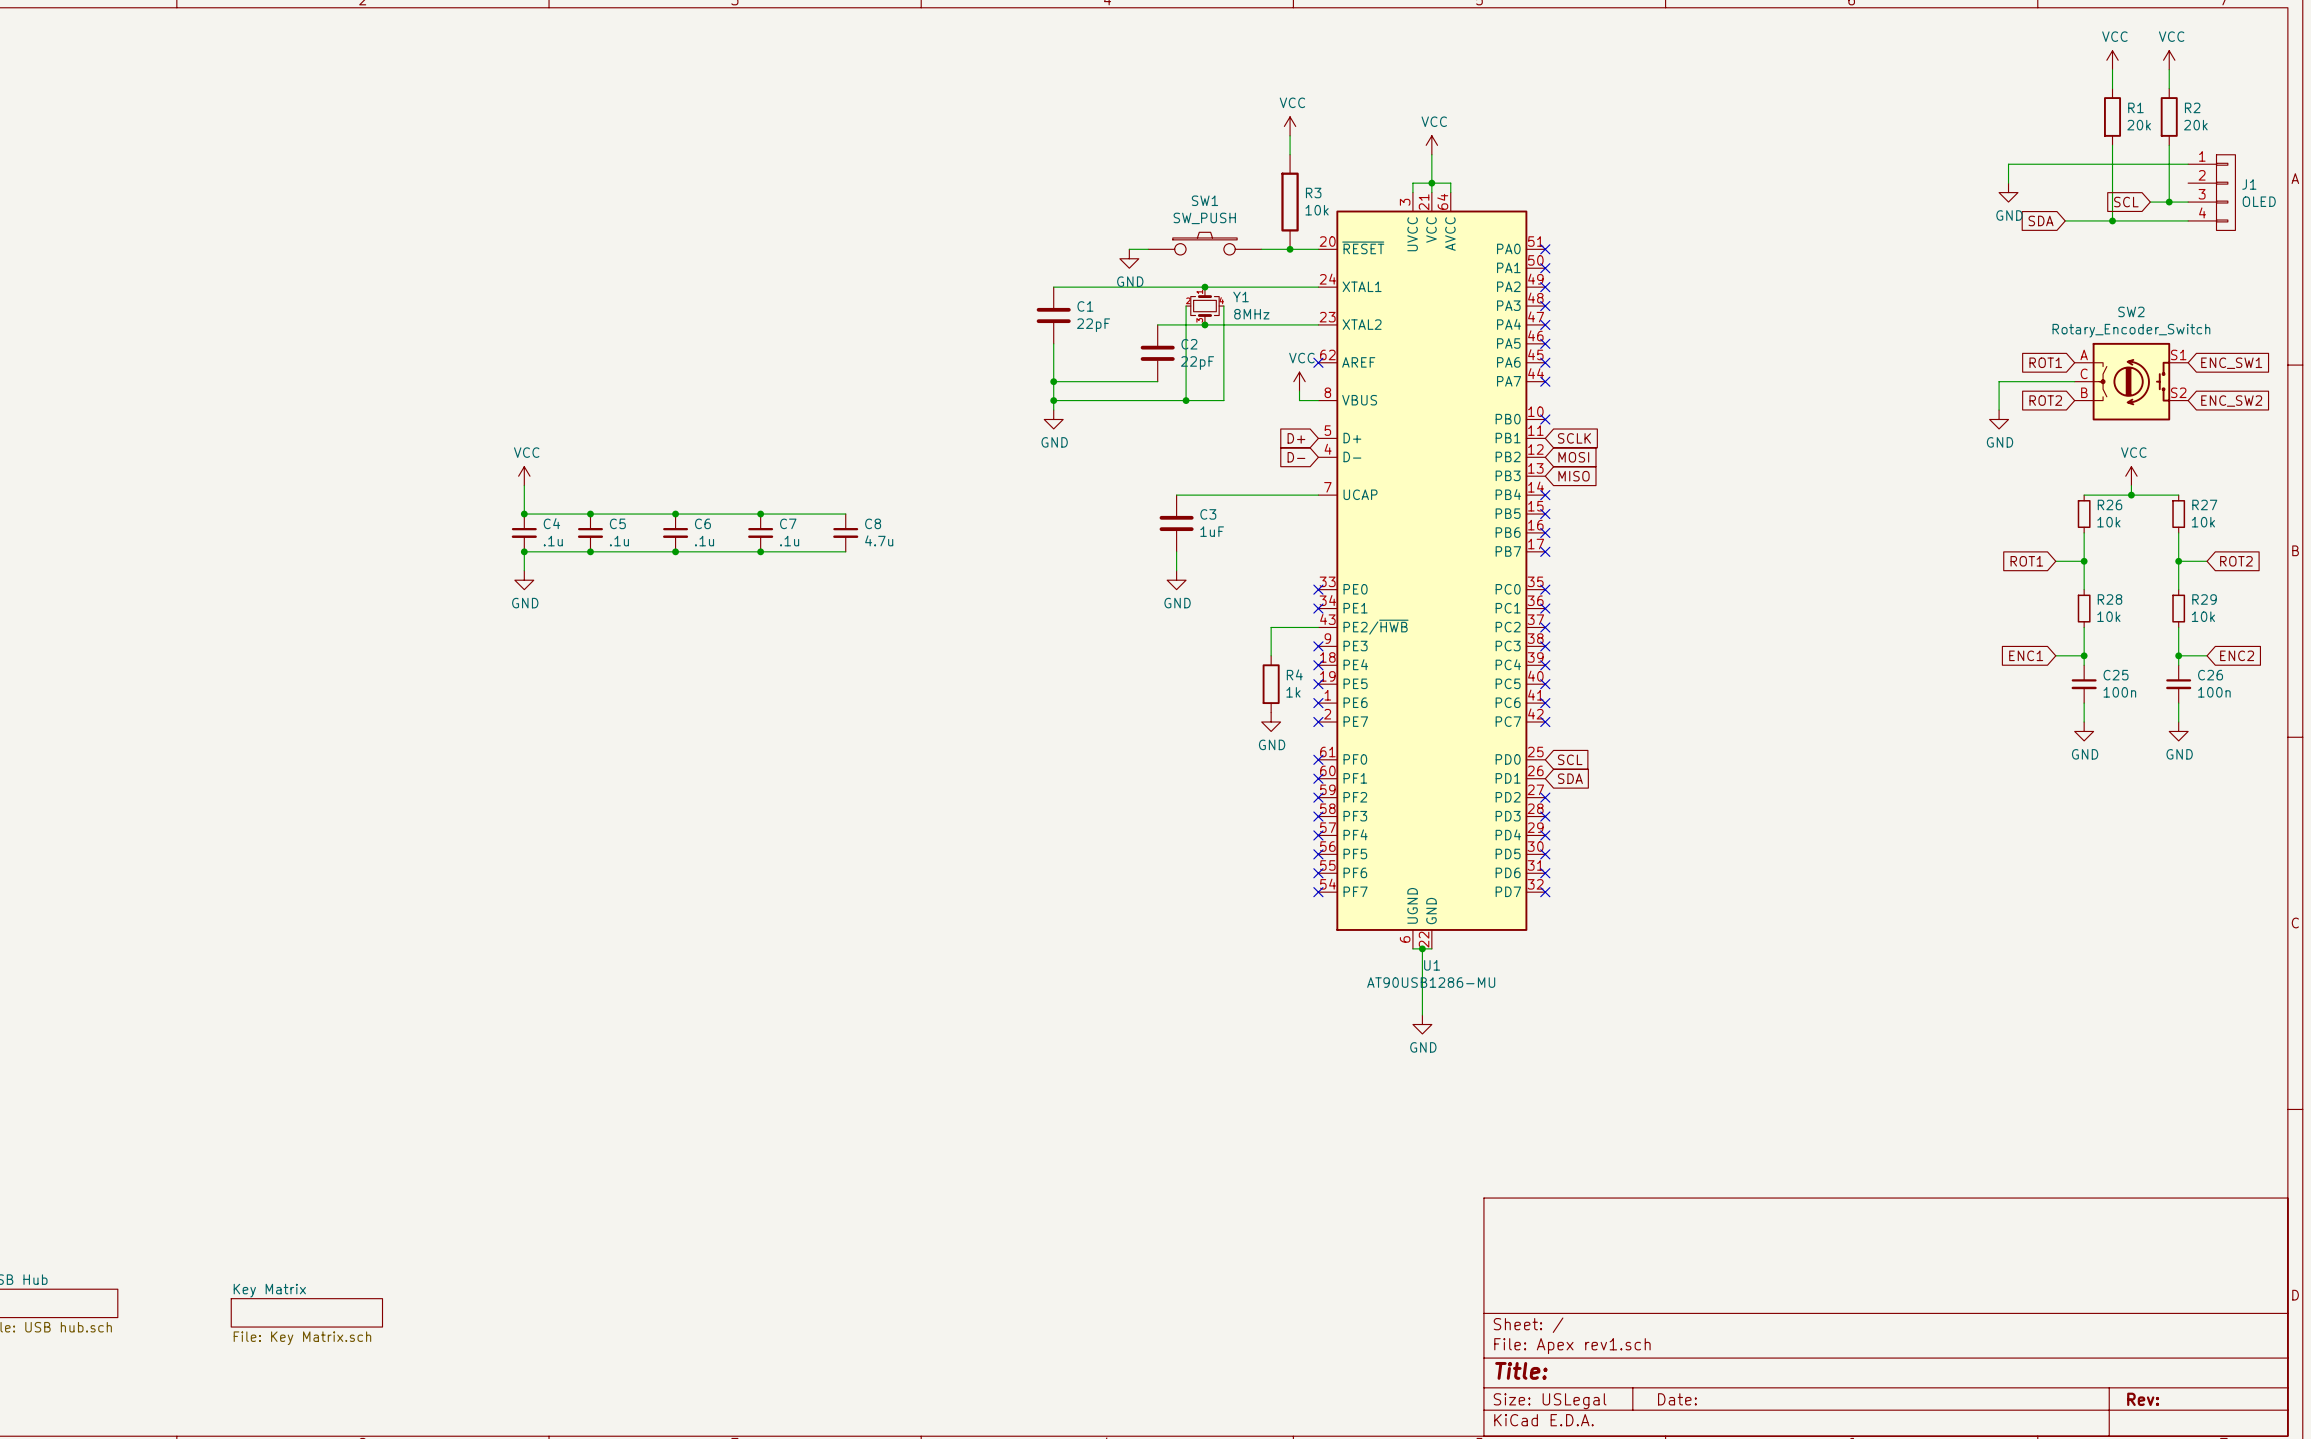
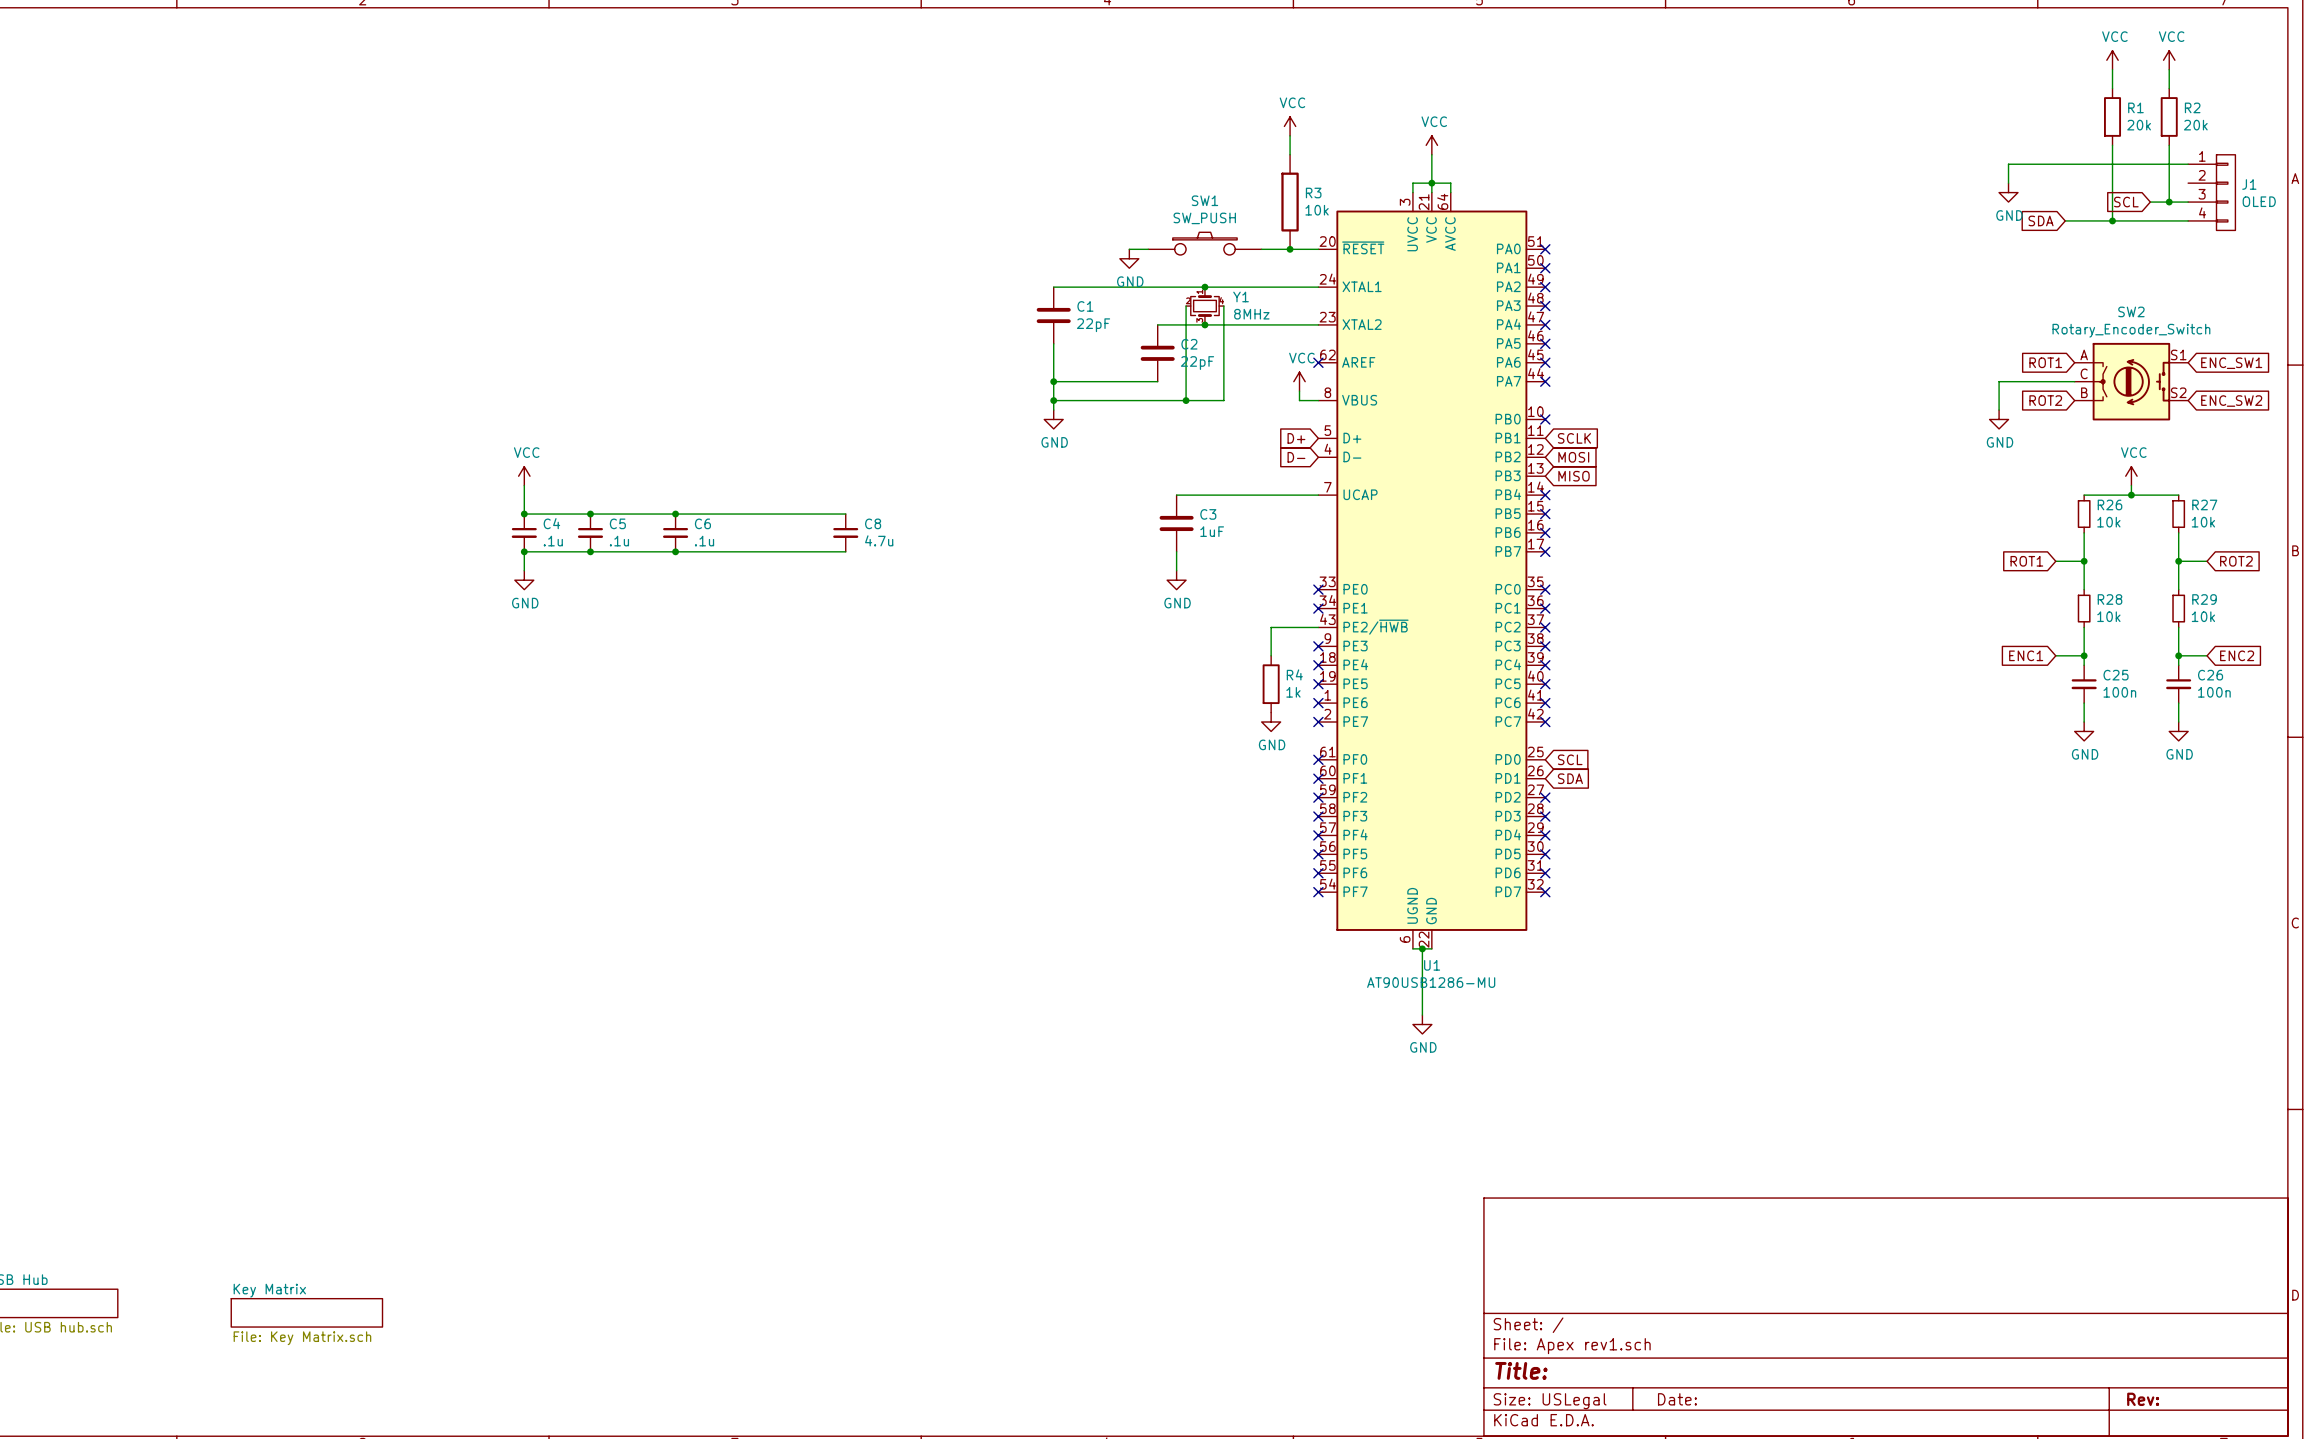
junction: (760, 514) -> none
C7: .1u (760, 532) -> none
junction: (760, 551) -> none

